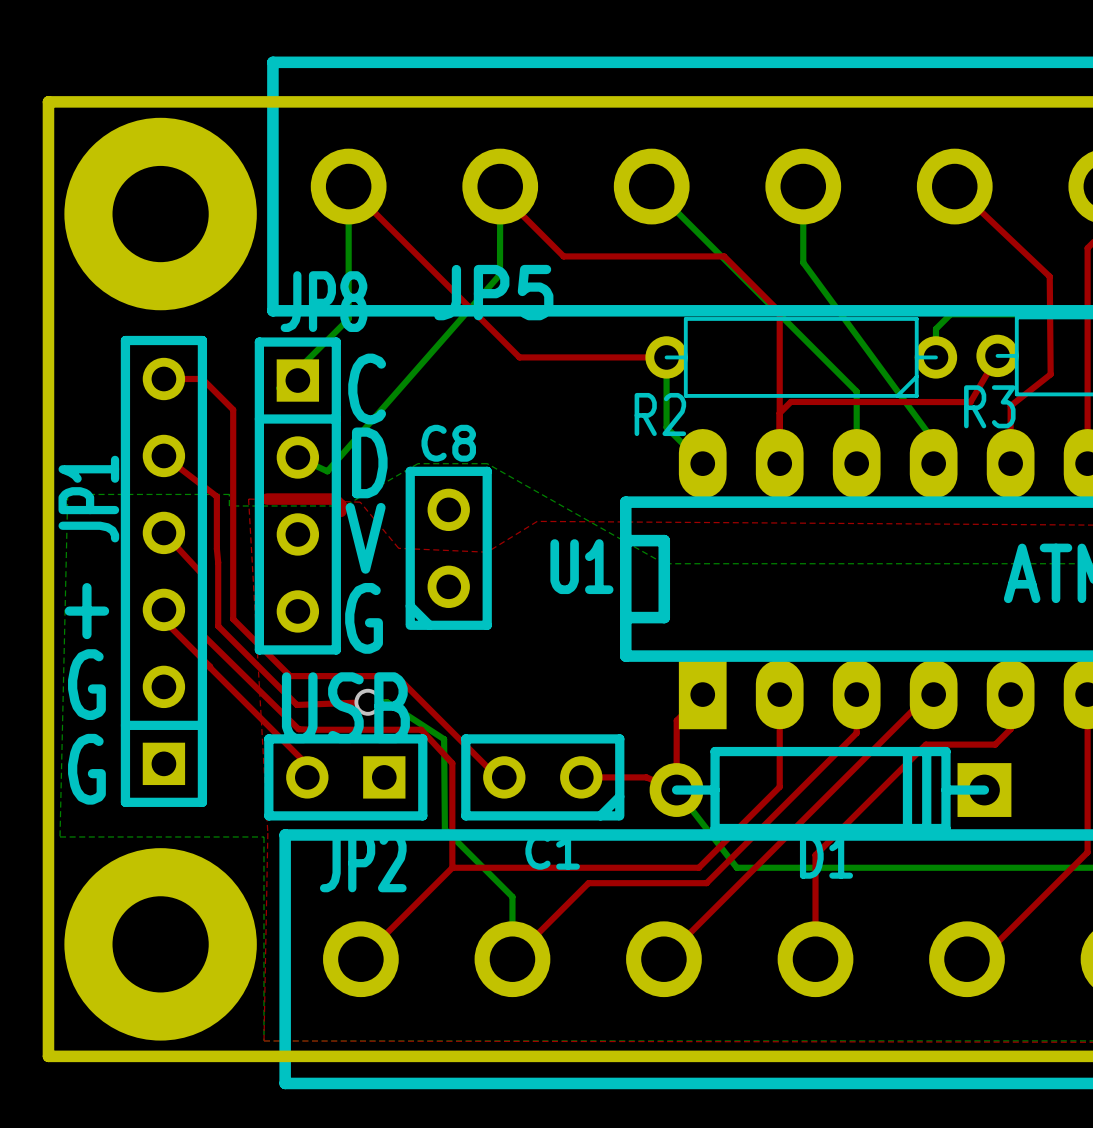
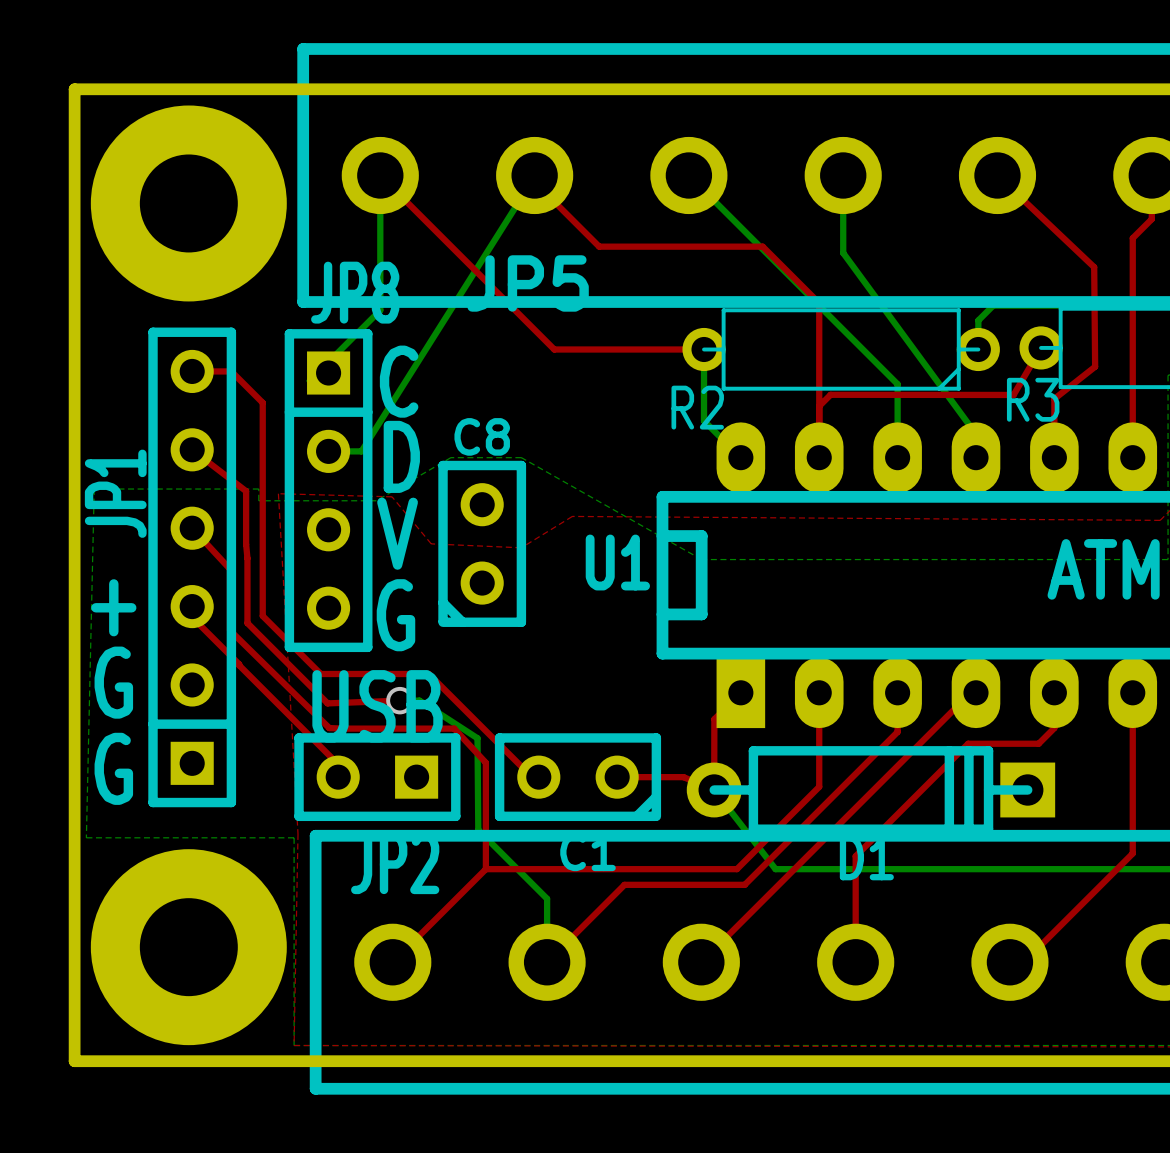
bottom track: (500, 186) (499, 274) (327, 471) (297, 457) -> (534, 175) (361, 451) (328, 451)
top track: (267, 499) (334, 499) (340, 505) (340, 511) -> none

